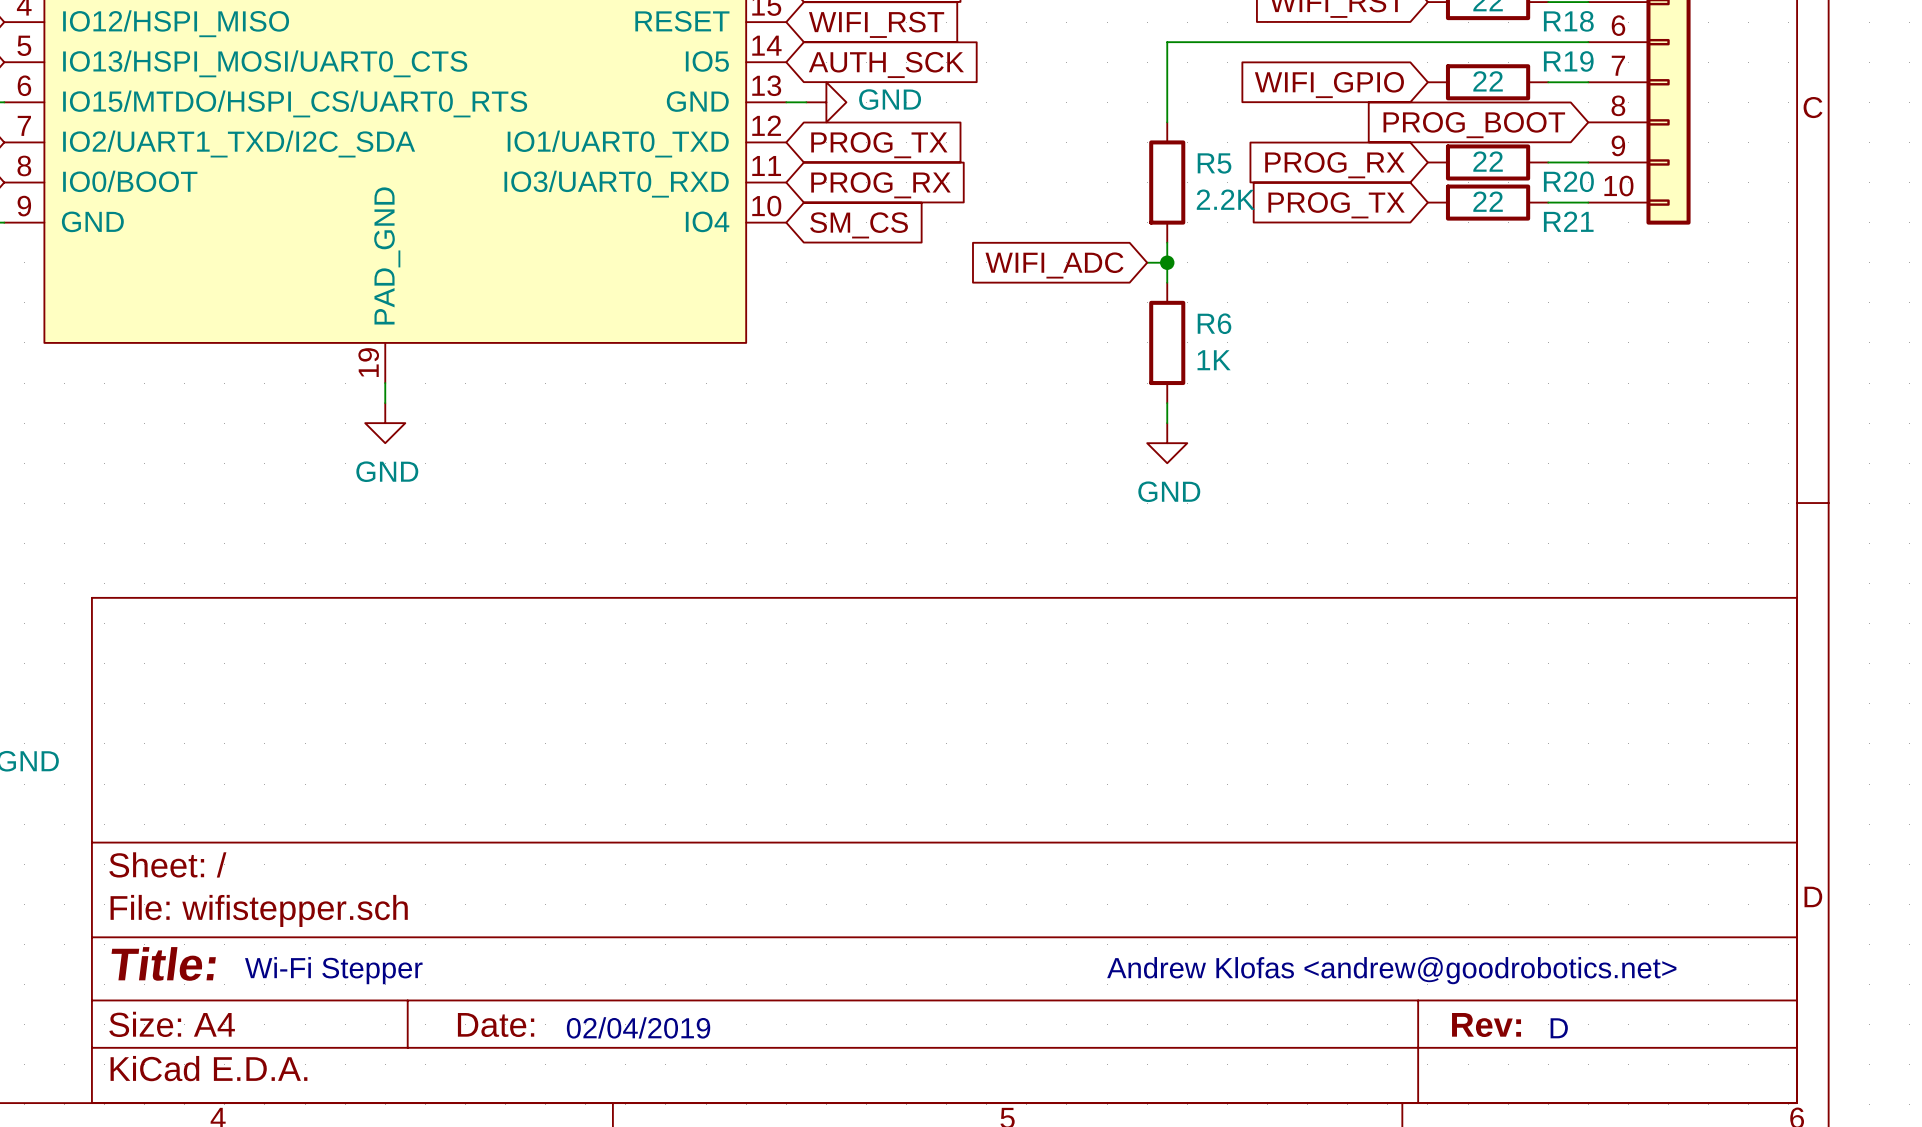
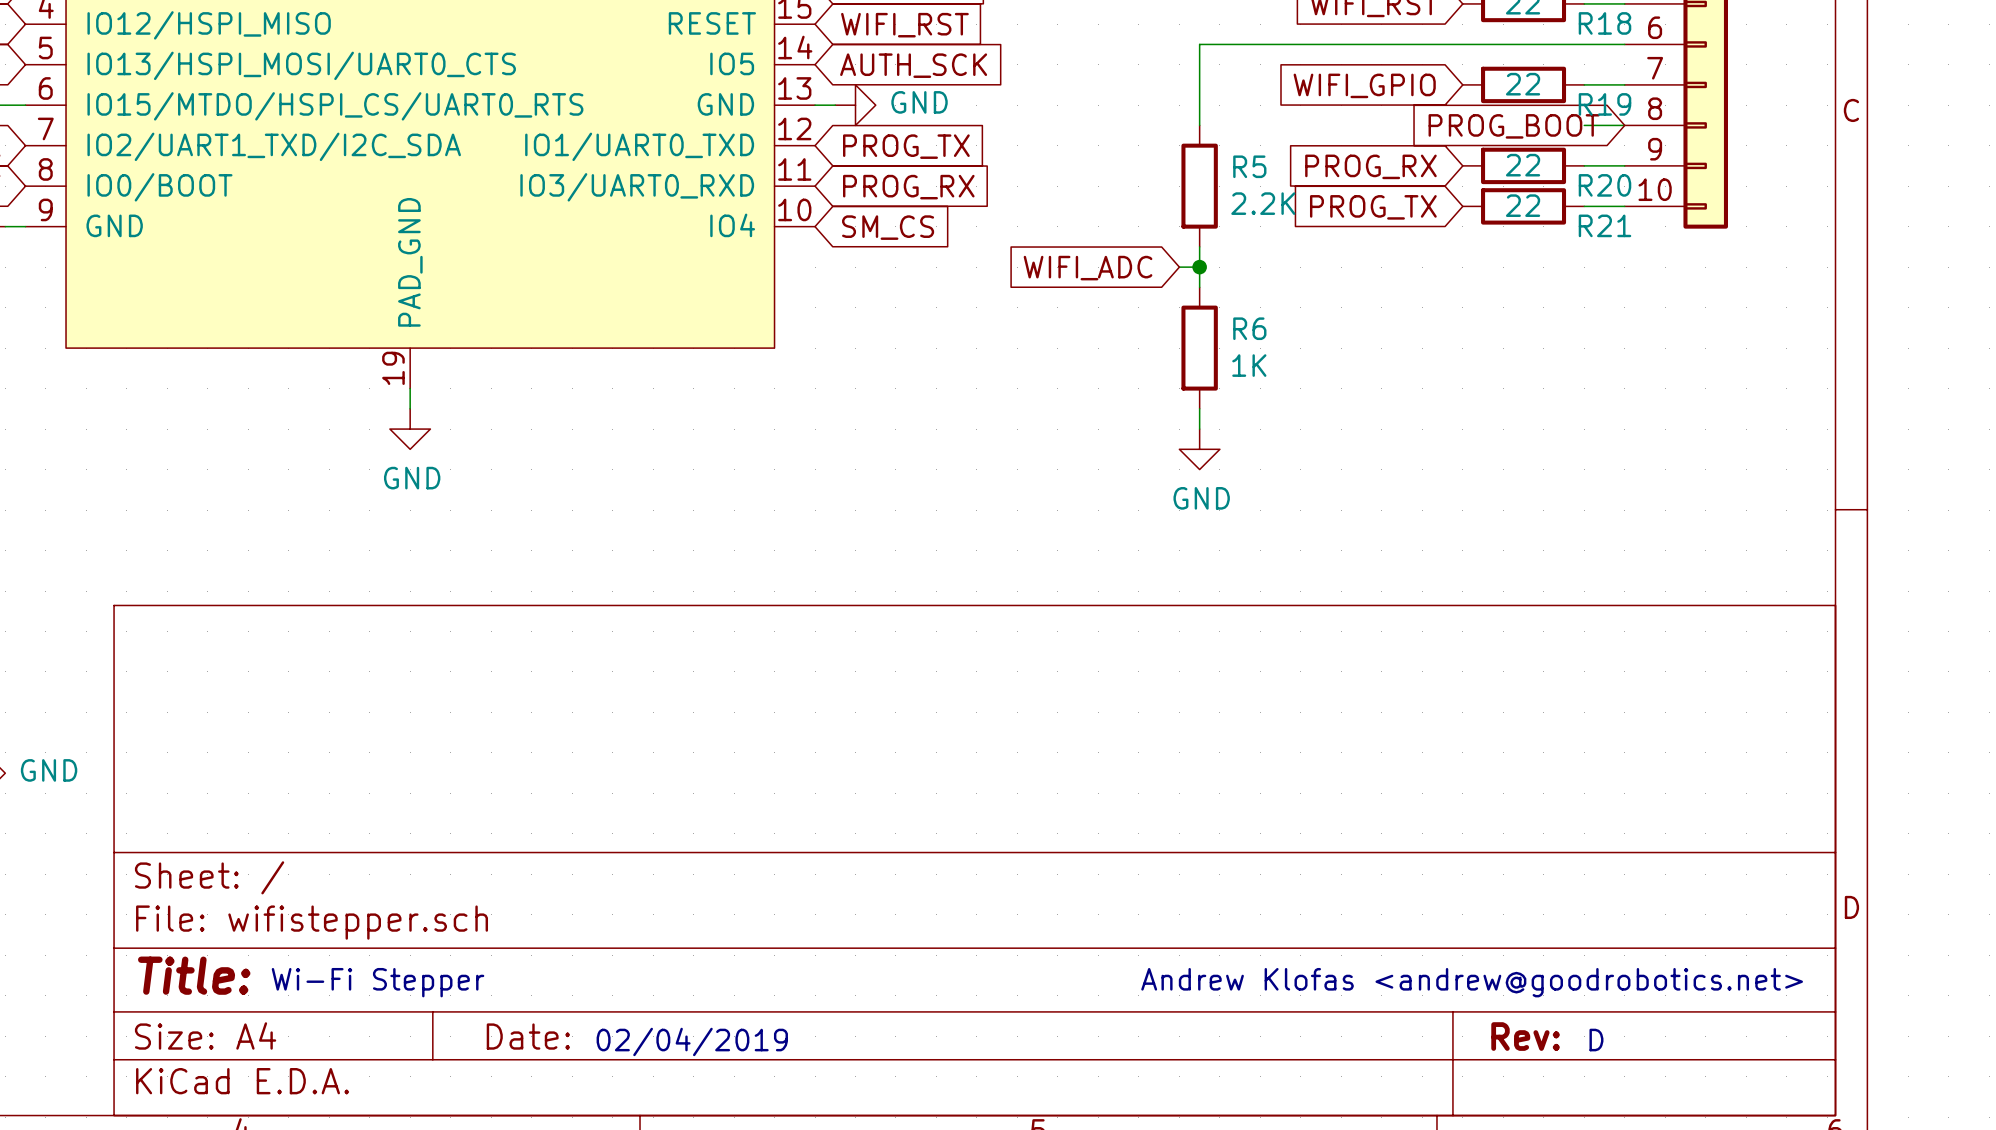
R19 name position: R19 (1568, 61) -> R19 (1604, 104)
wire: none -> (1584, 125) (1624, 125)

